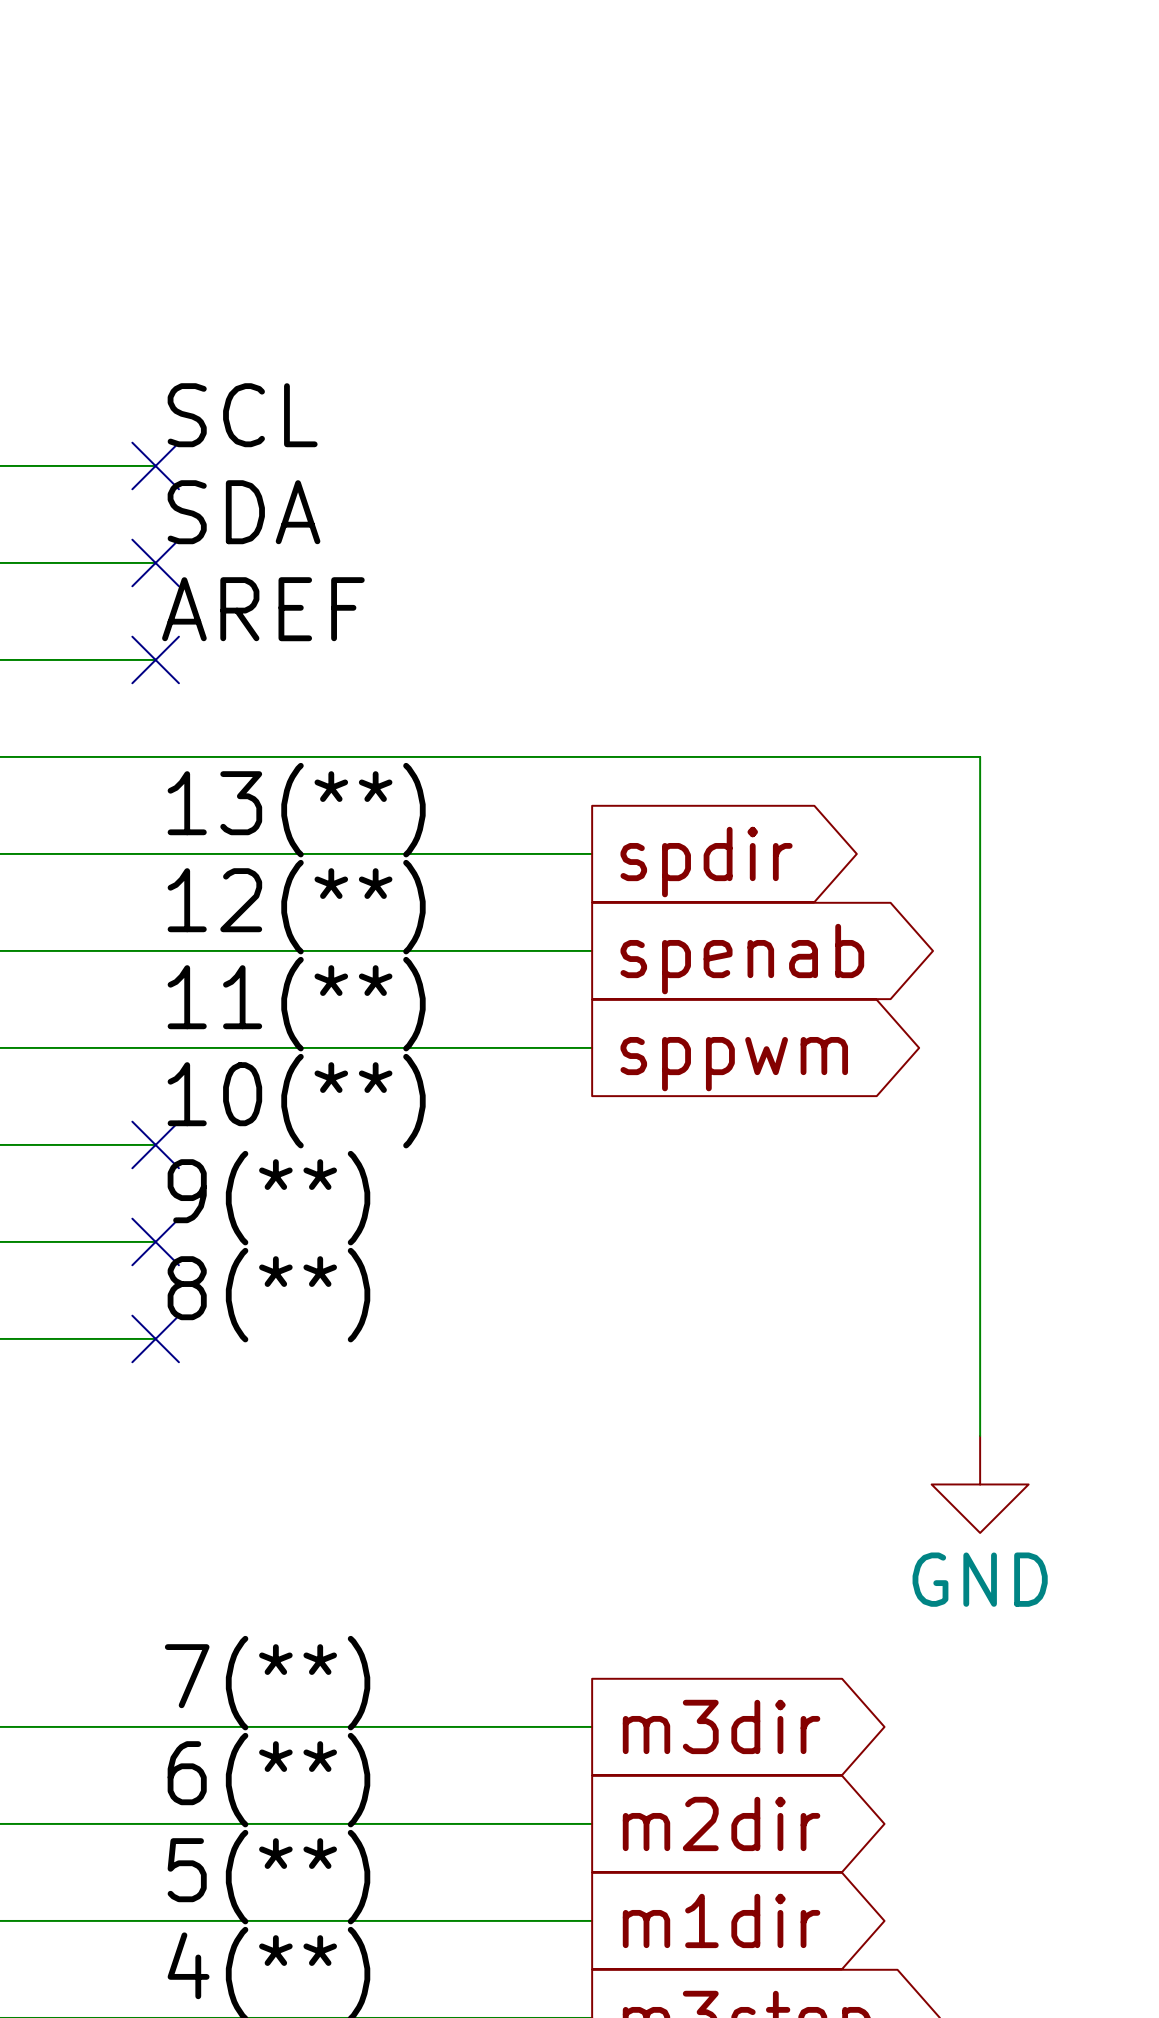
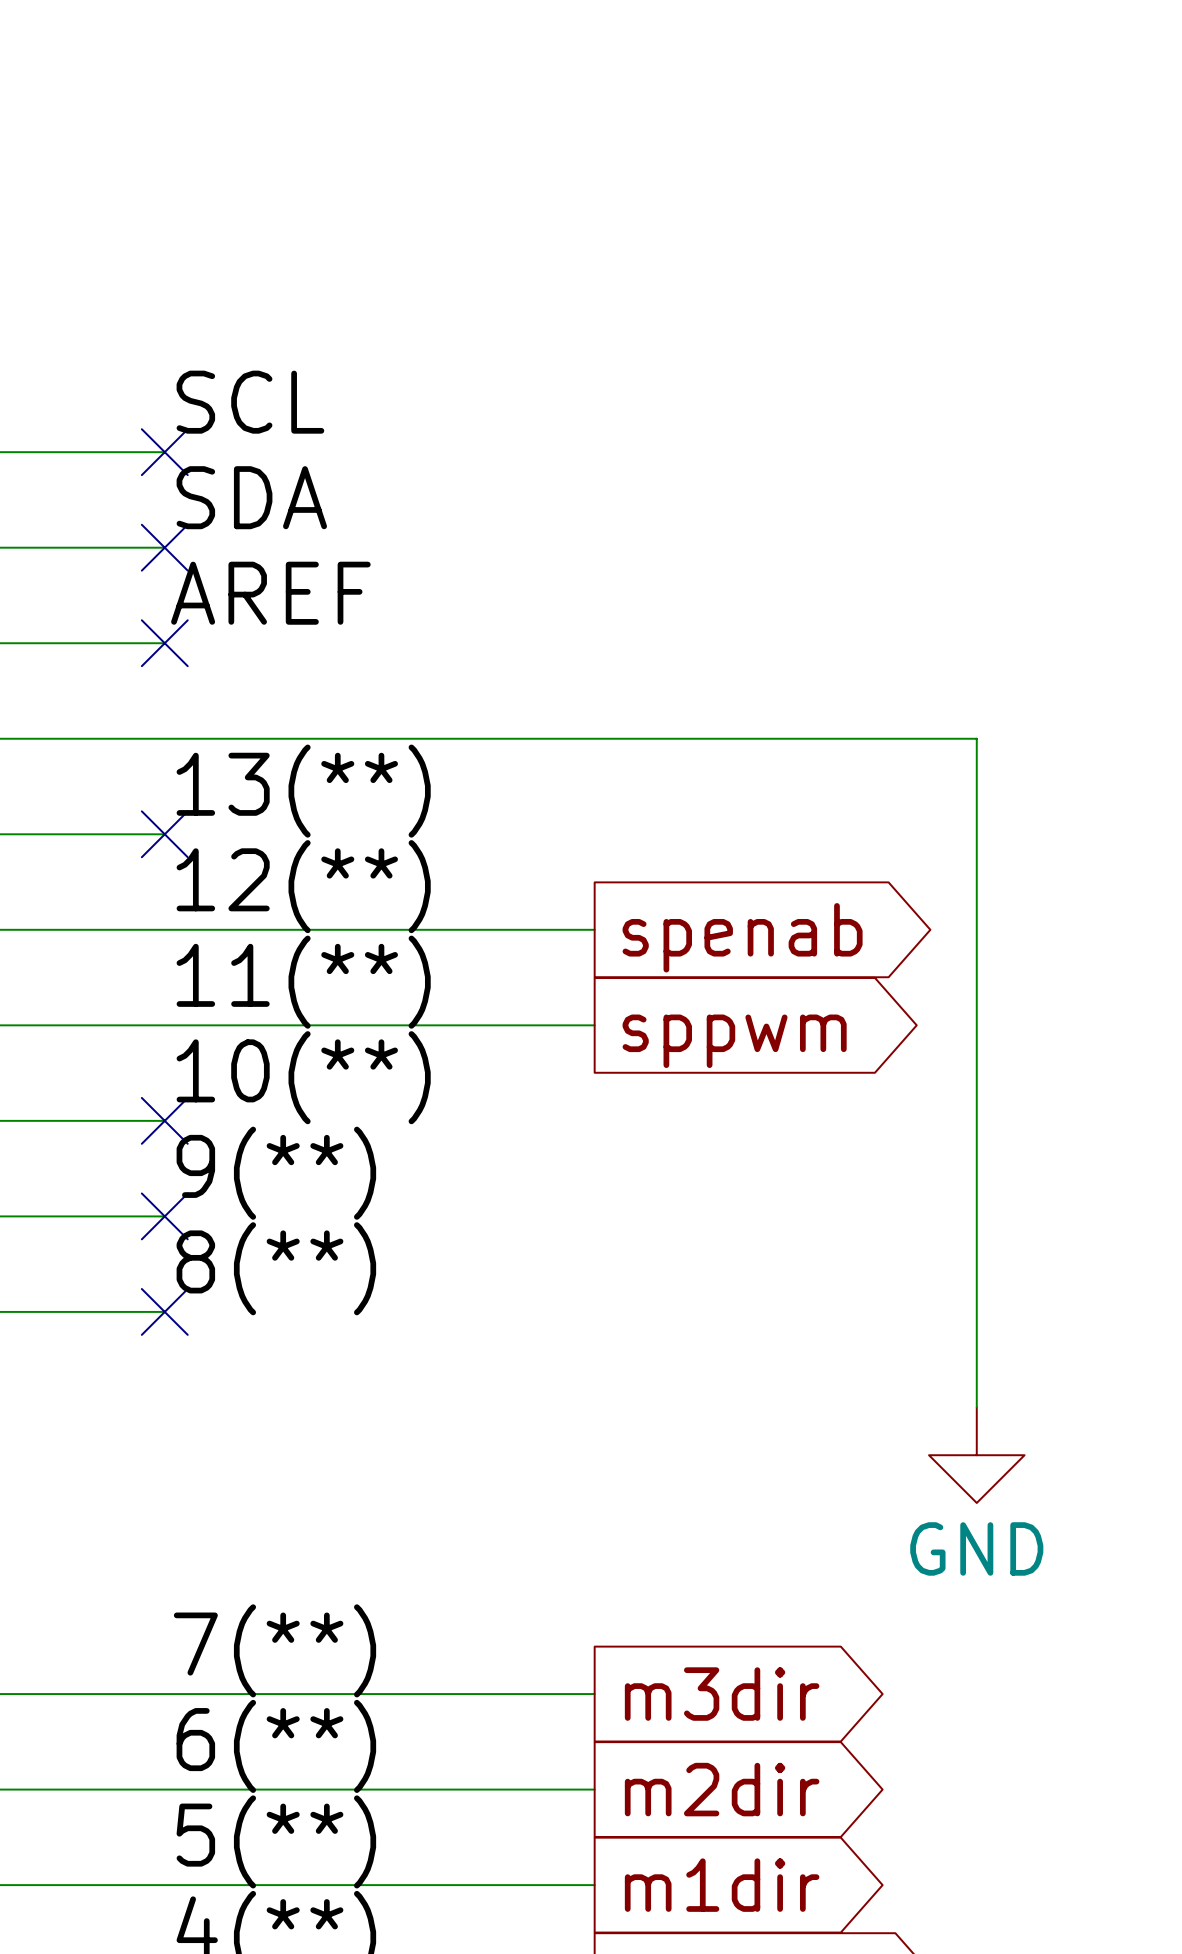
wire: (155, 853) (592, 853) -> none
no-connect mark: none -> (164, 834)
global label: spdir (706, 862) -> none

